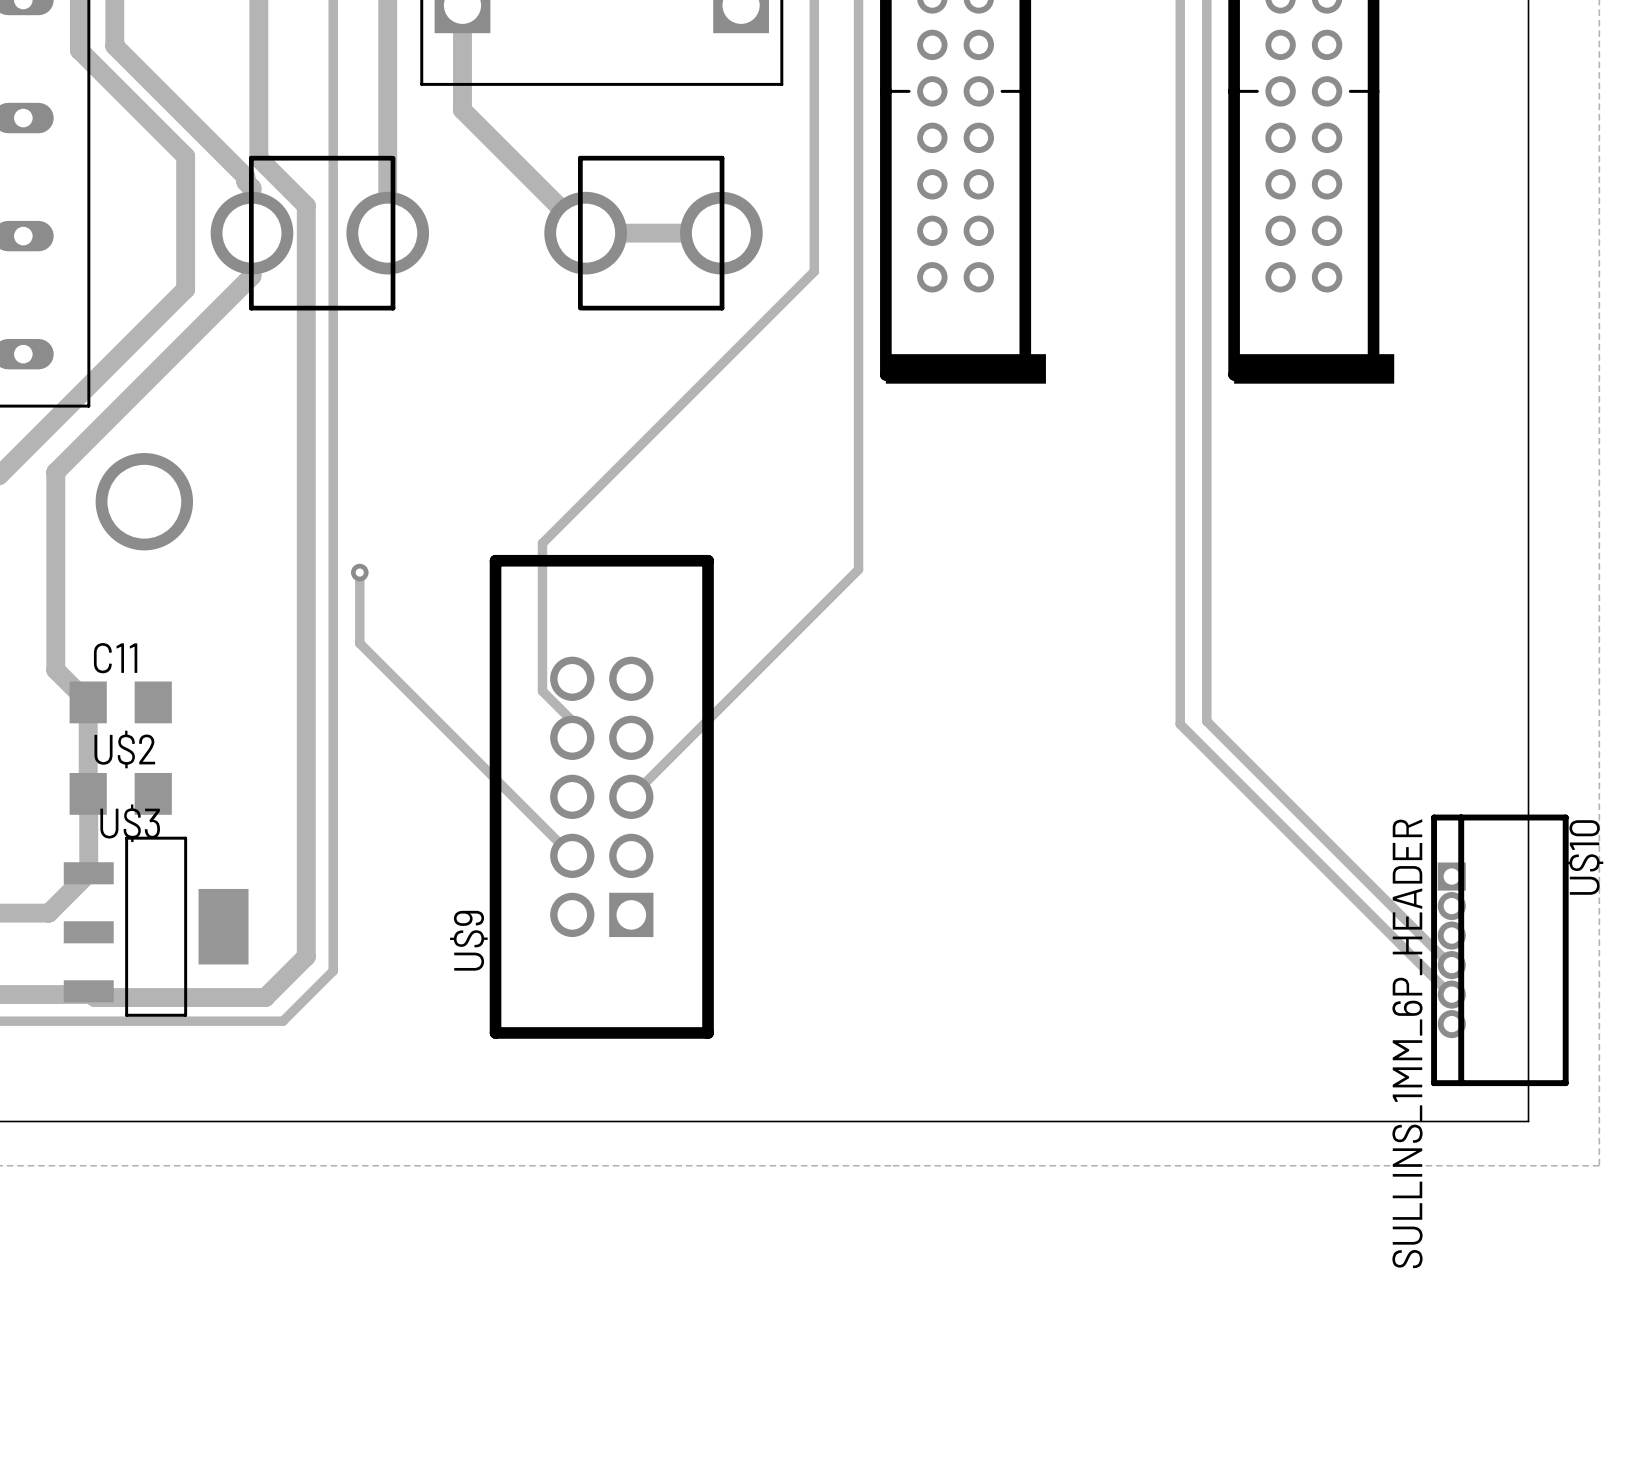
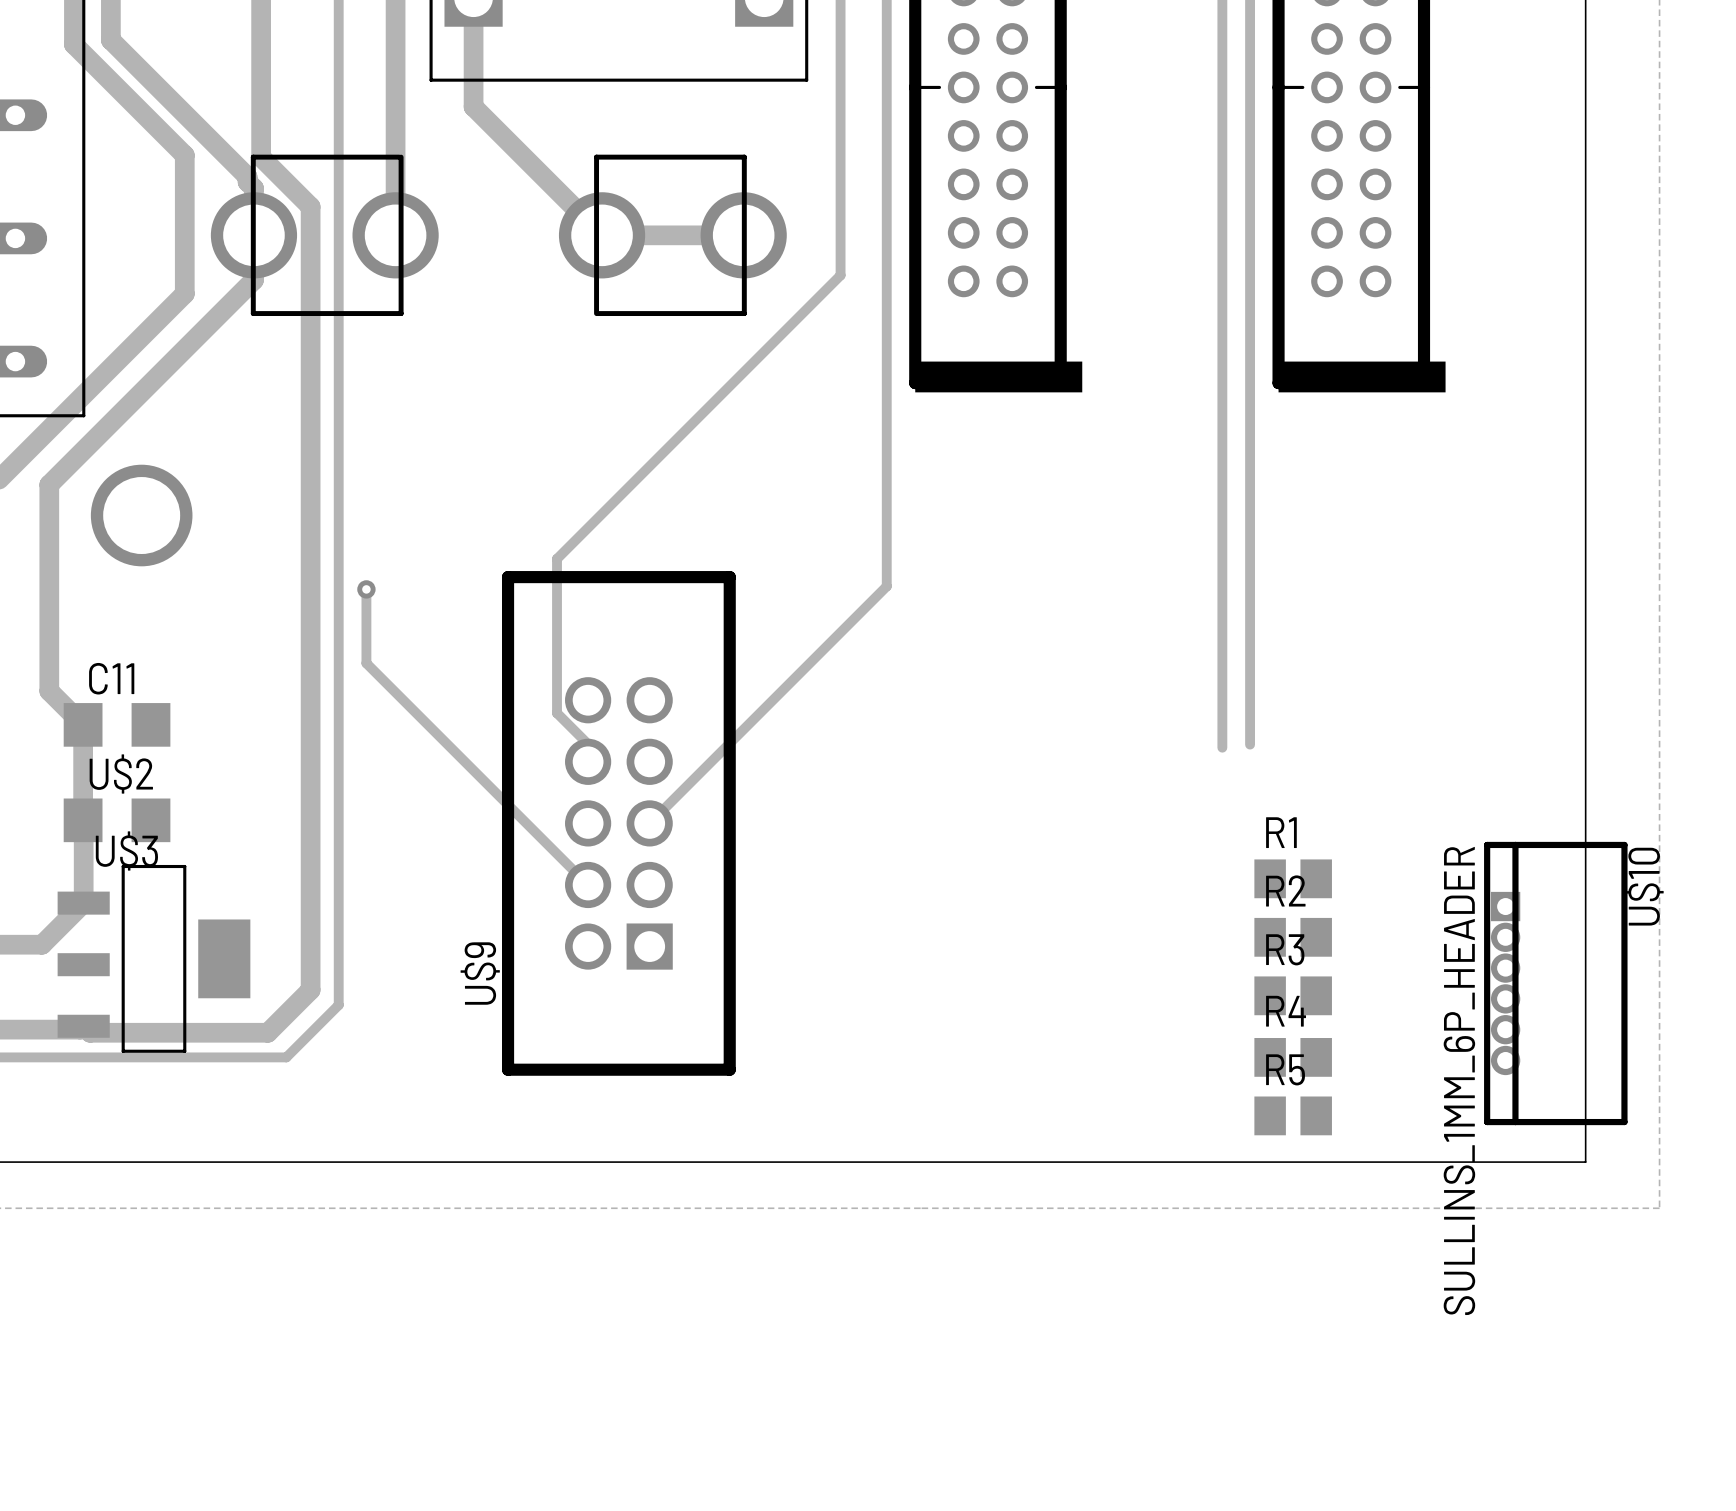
track: (1206, 721) (1451, 965) -> none
track: (1180, 724) (1451, 994) -> none
R1: none -> (1293, 878)
R2: none -> (1293, 937)
R3: none -> (1293, 995)
R4: none -> (1293, 1057)
R5: none -> (1293, 1115)

